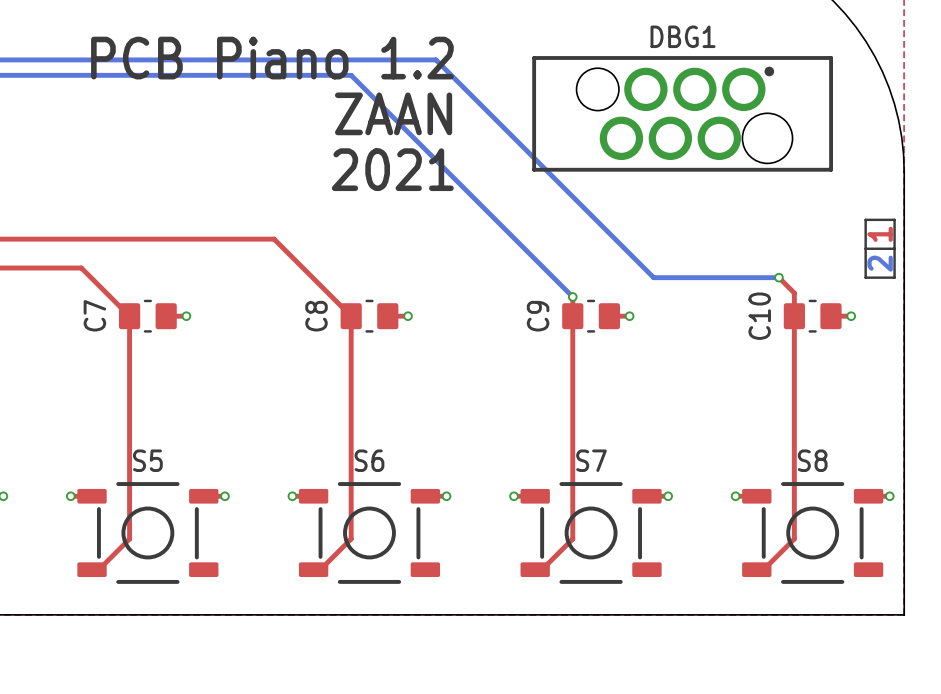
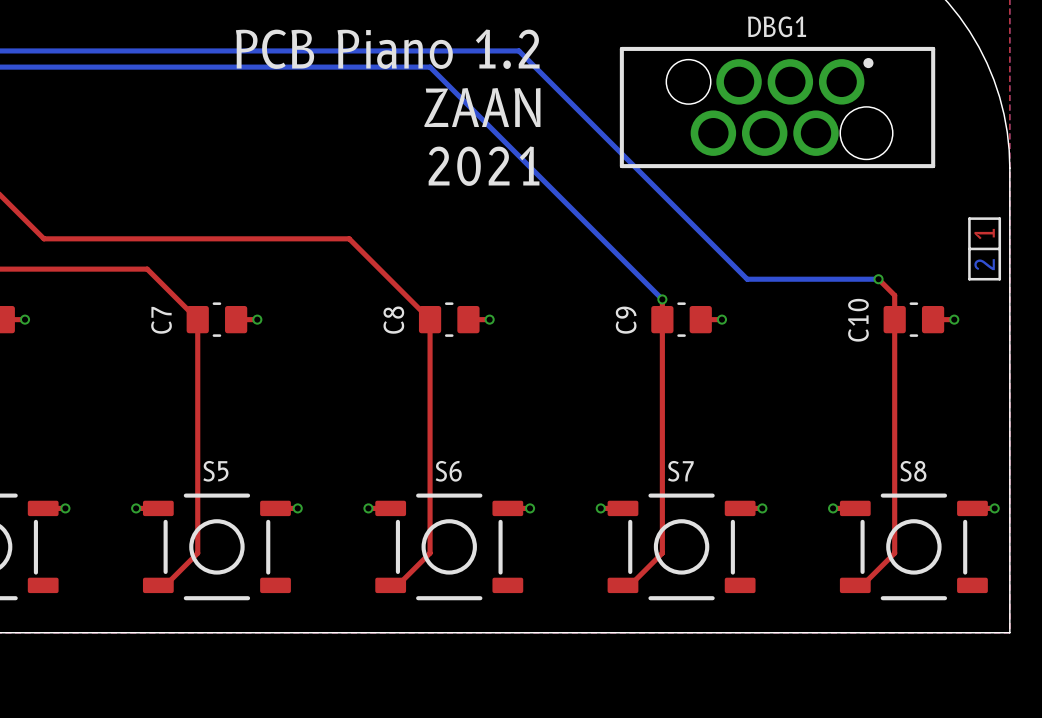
drawing shape: [864, 218, 896, 279] -> [968, 217, 1002, 281]

